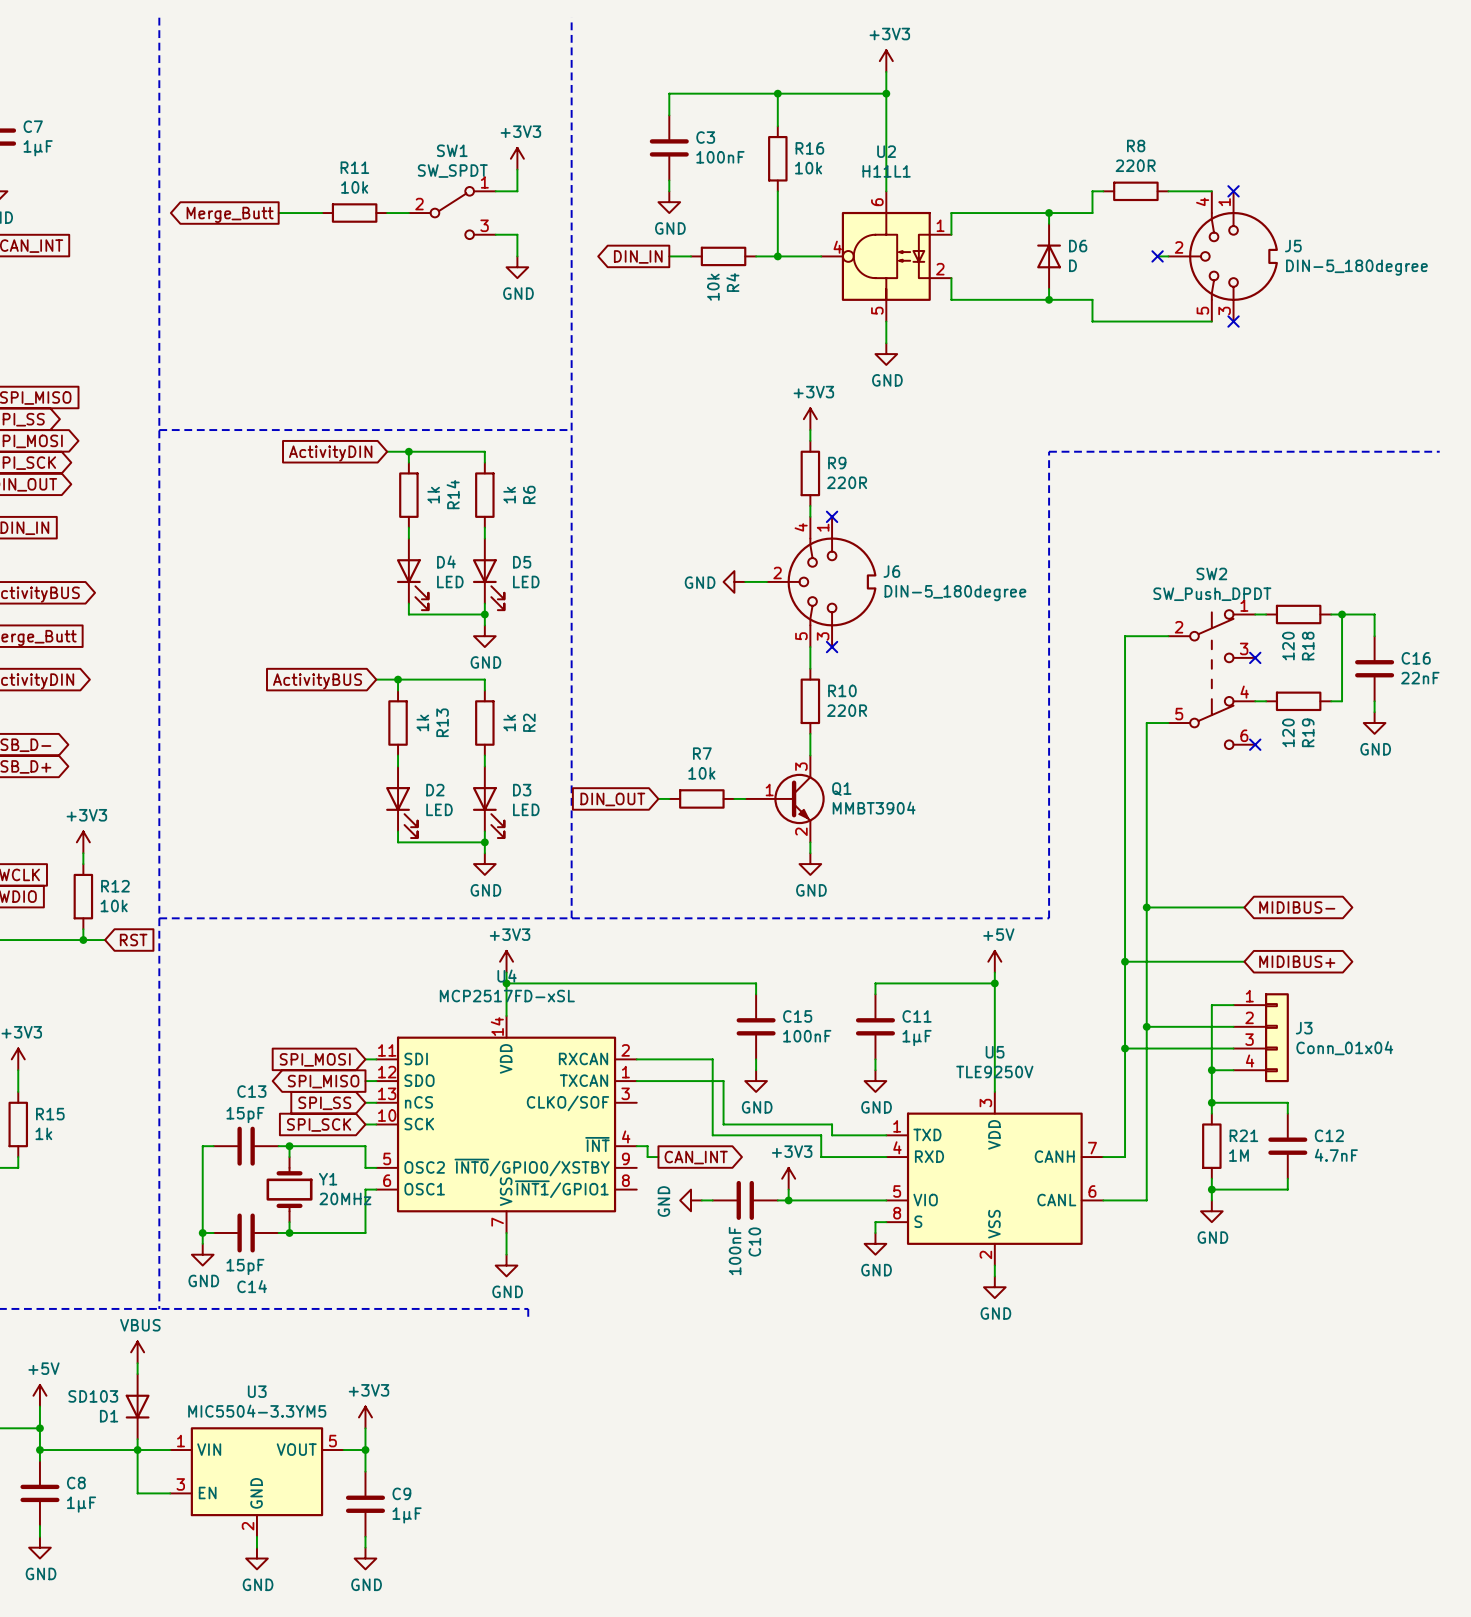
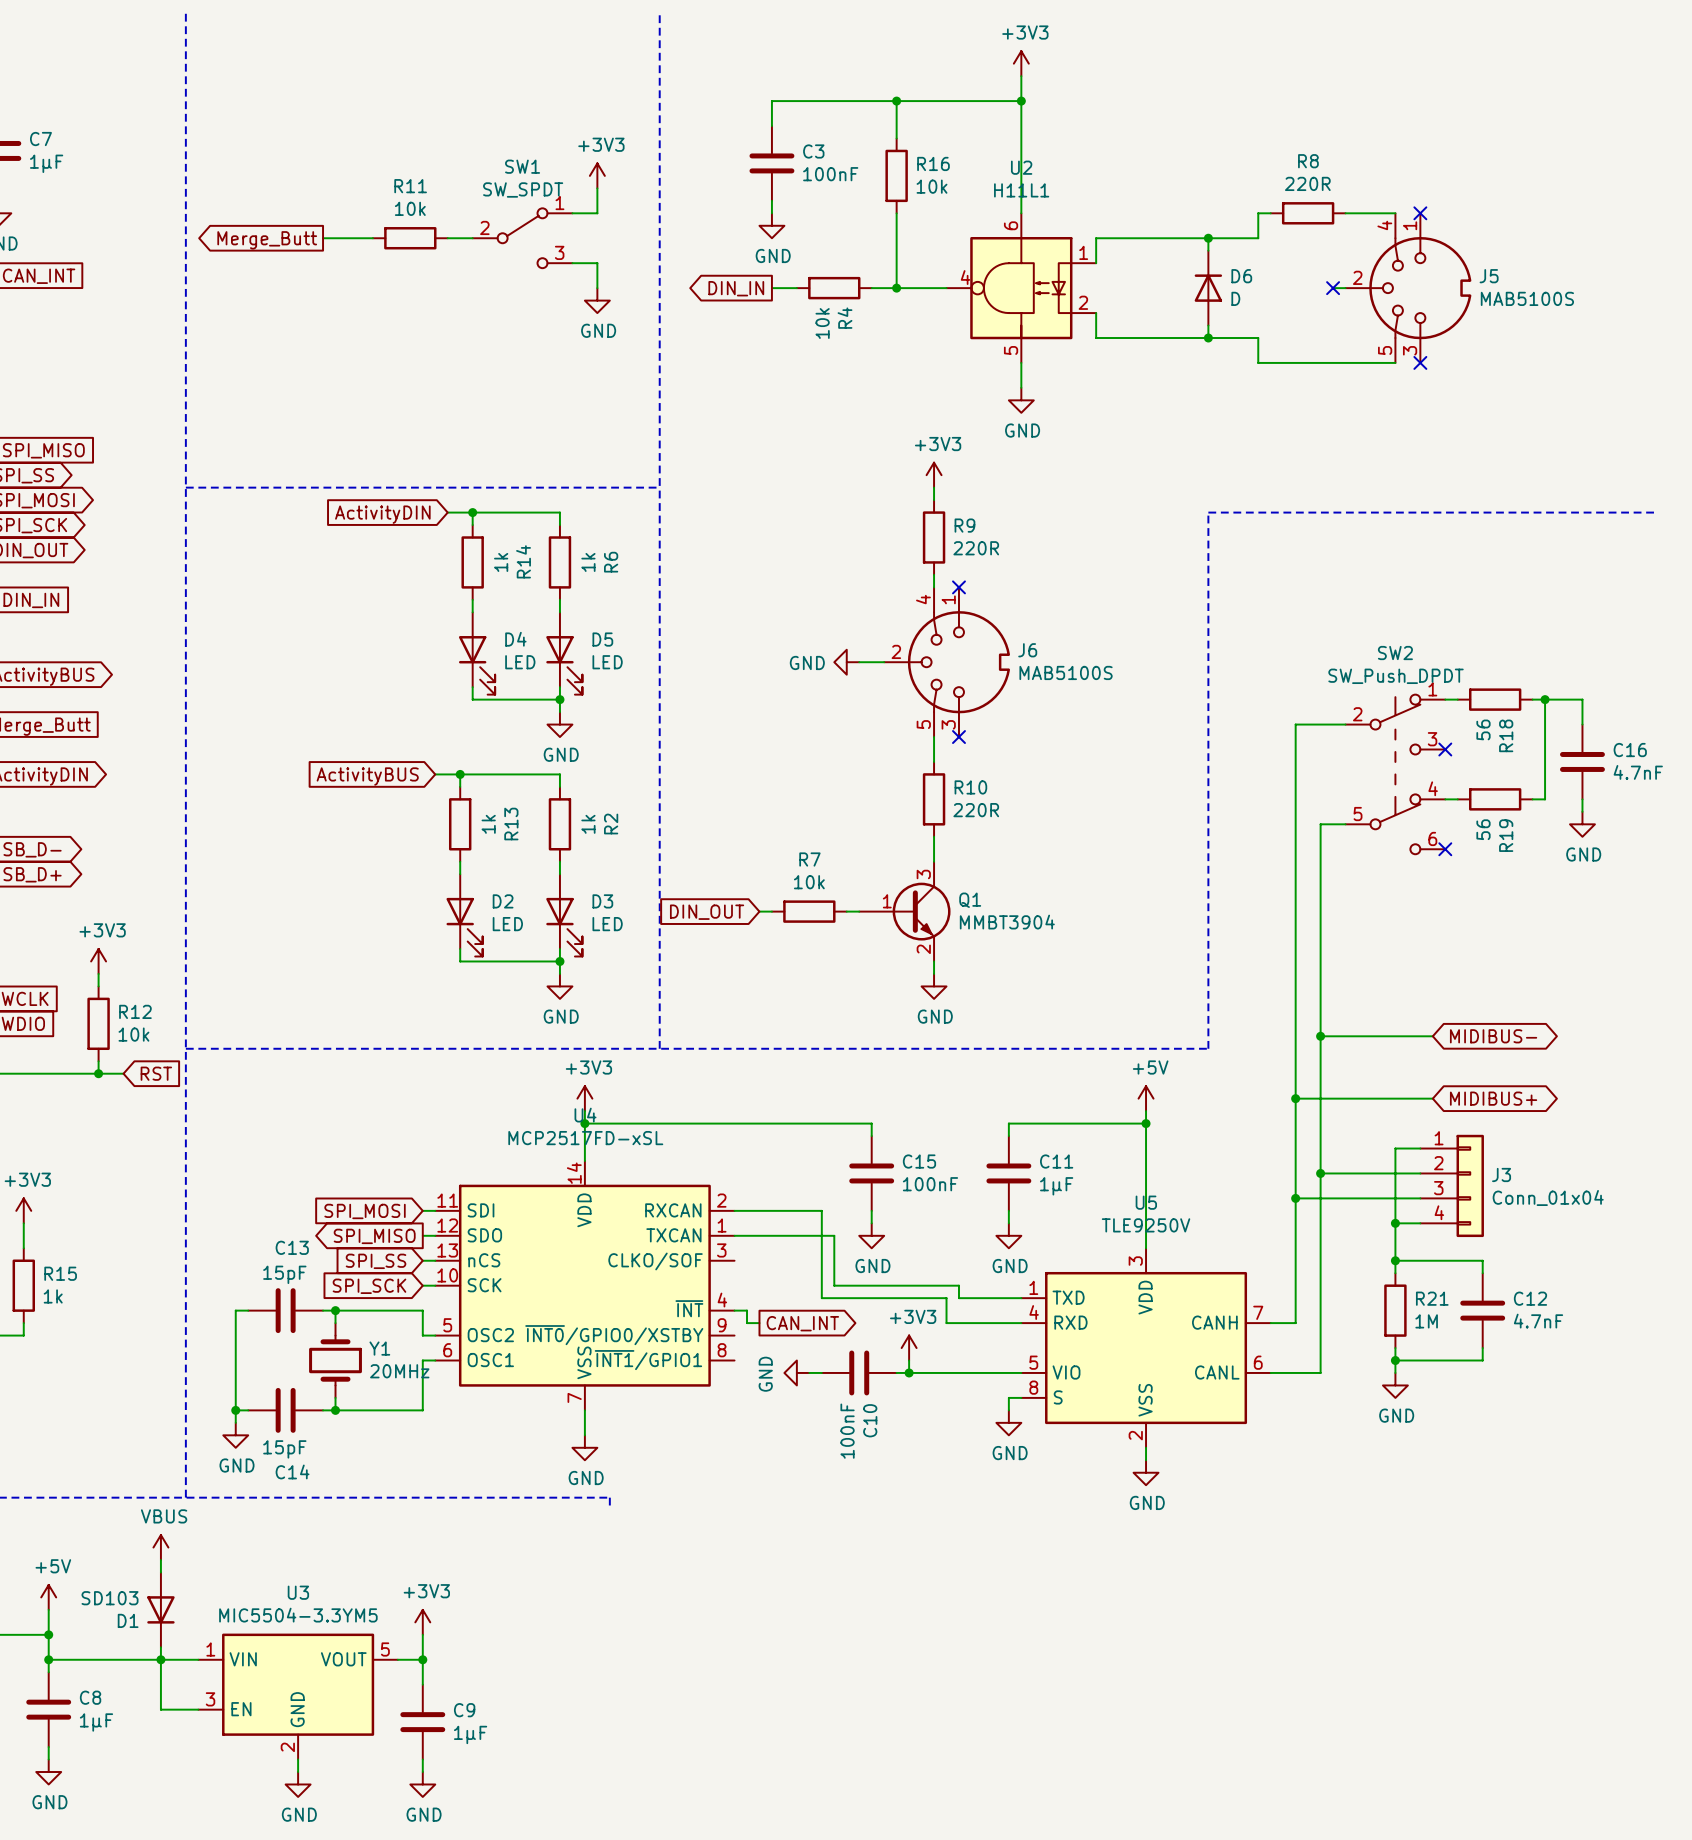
J5 value: DIN-5_180degree (1356, 267) -> MAB5100S (1527, 298)
J6 value: DIN-5_180degree (955, 593) -> MAB5100S (1066, 672)
R18 value: 120 (1288, 646) -> 56 (1483, 729)
C16 value: 22nF (1420, 678) -> 4.7nF (1638, 772)
R19 value: 120 (1288, 732) -> 56 (1483, 829)

